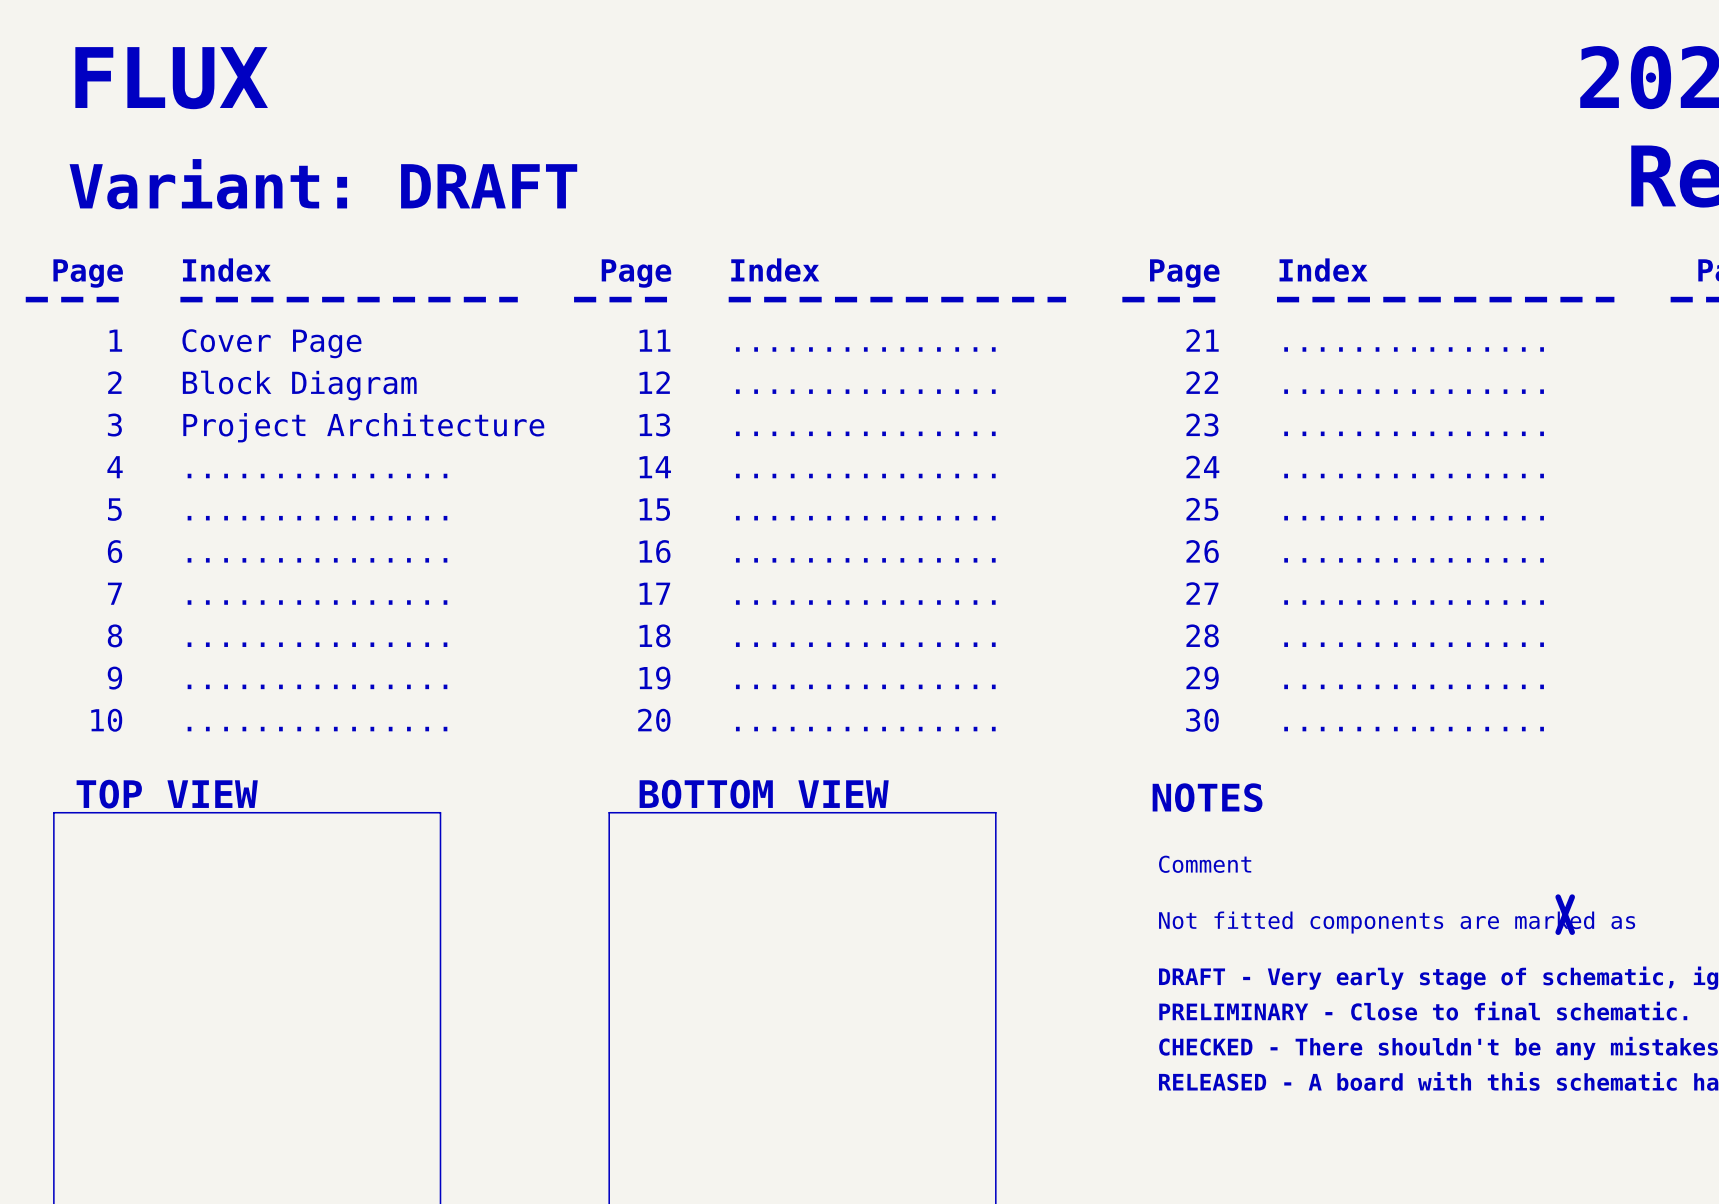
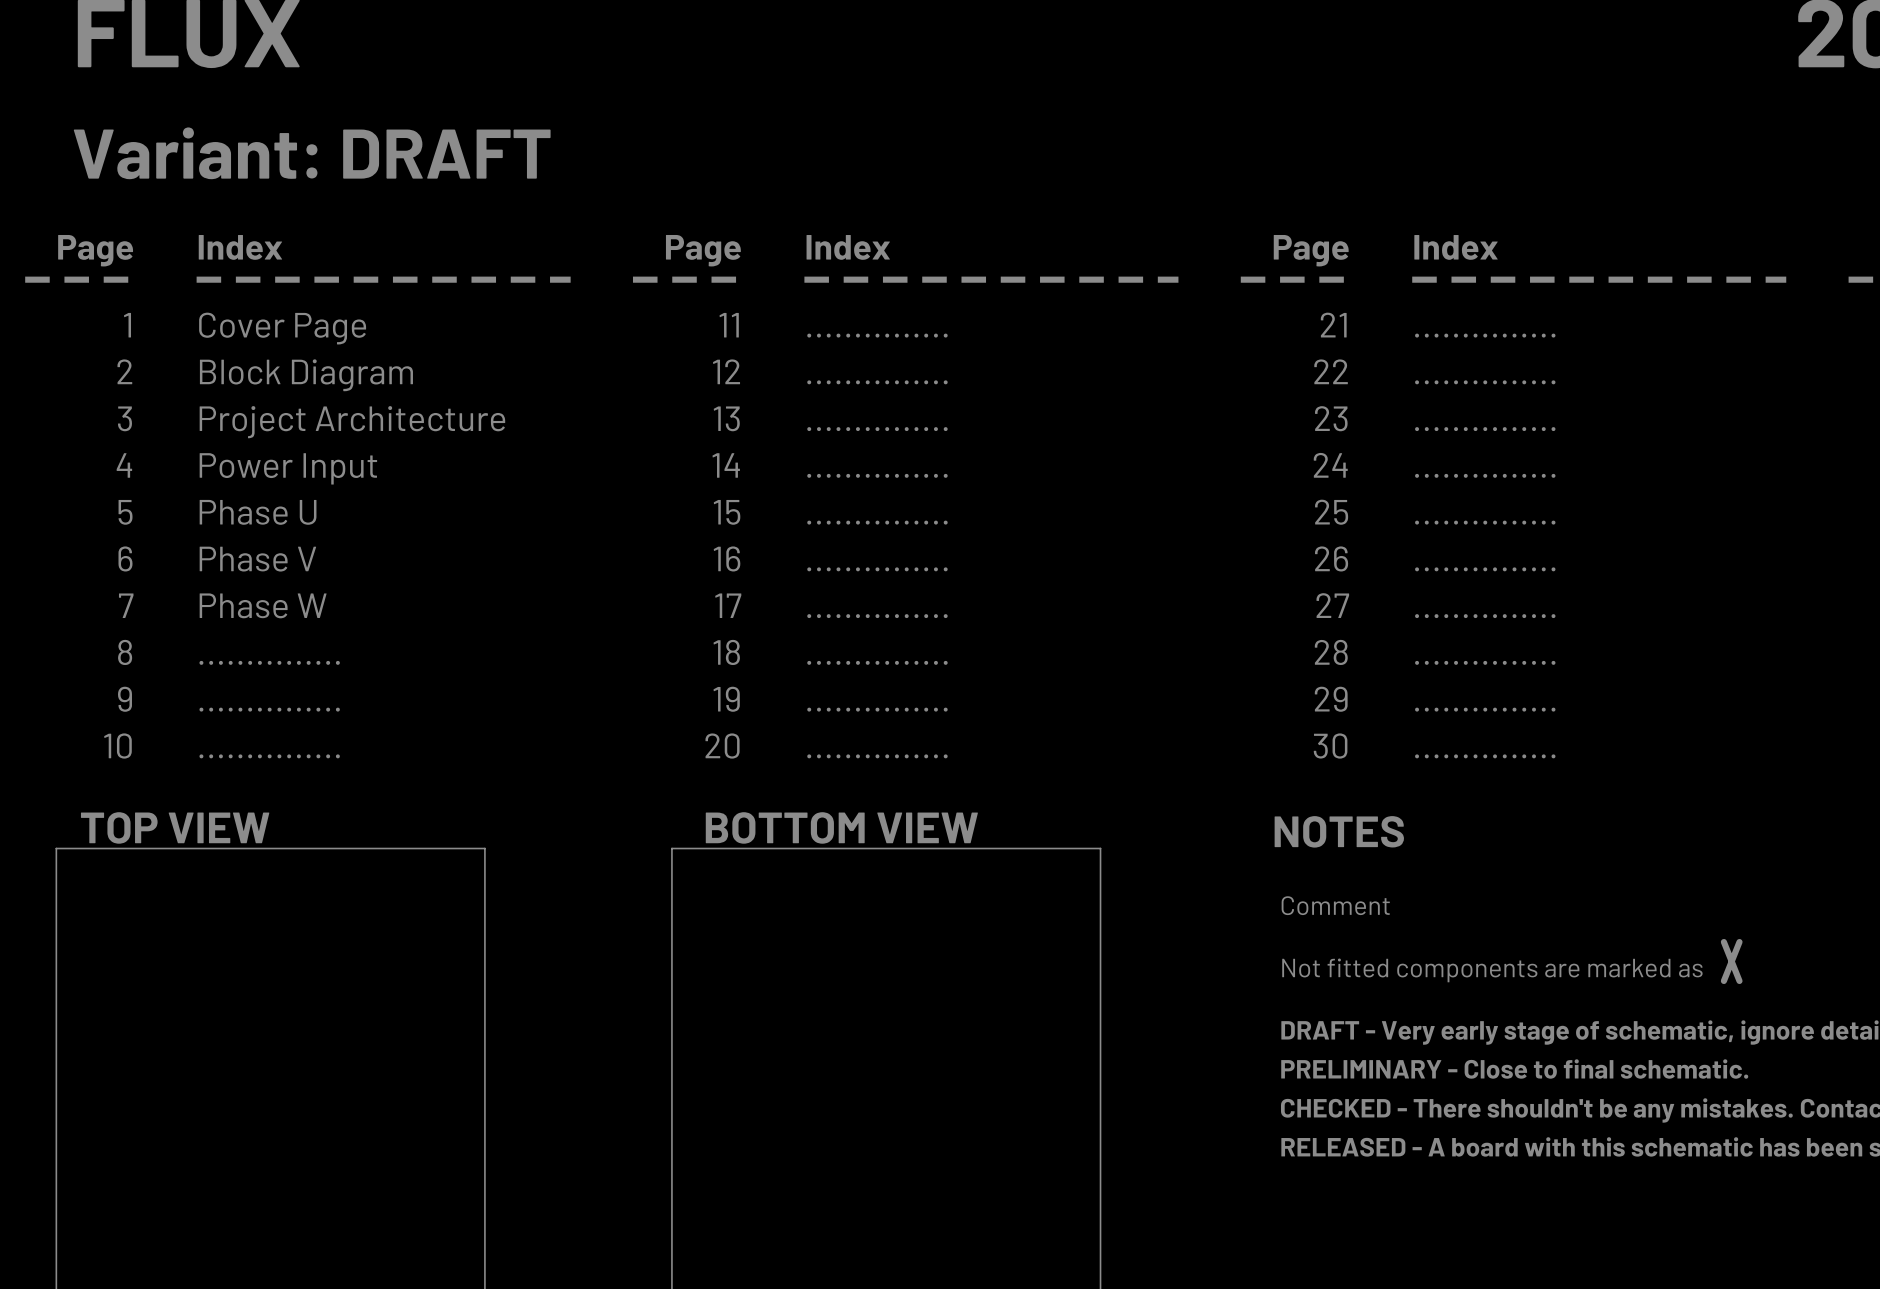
text: ............... (317, 476) -> Power Input (288, 468)
text: ............... (317, 518) -> Phase U (258, 512)
text: ............... (317, 560) -> Phase V (257, 559)
text: ............... (317, 602) -> Phase W (263, 605)

